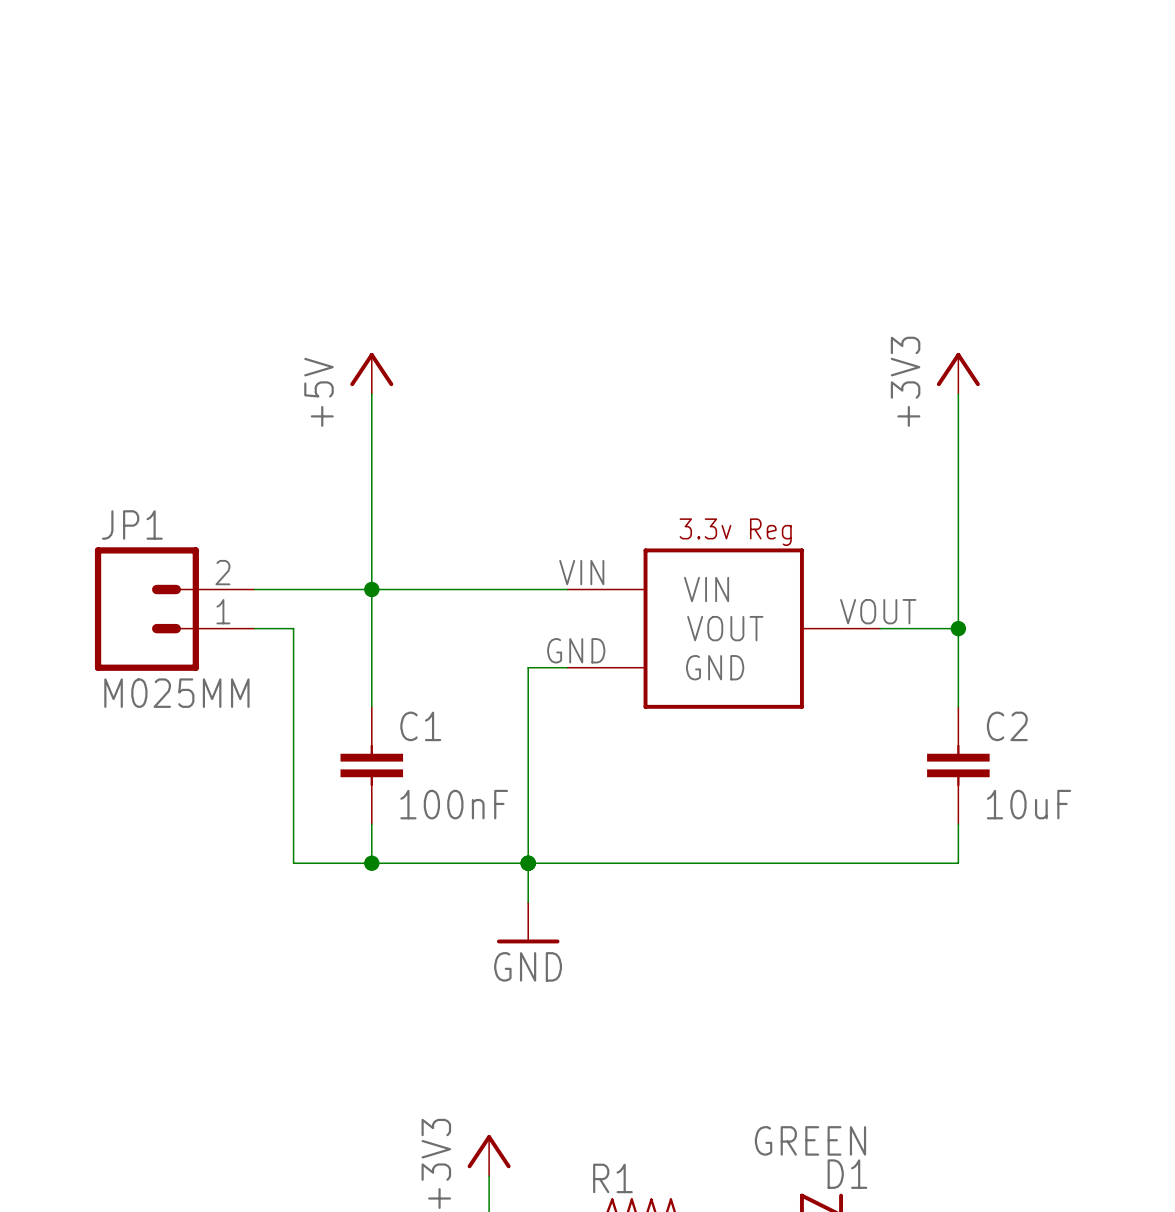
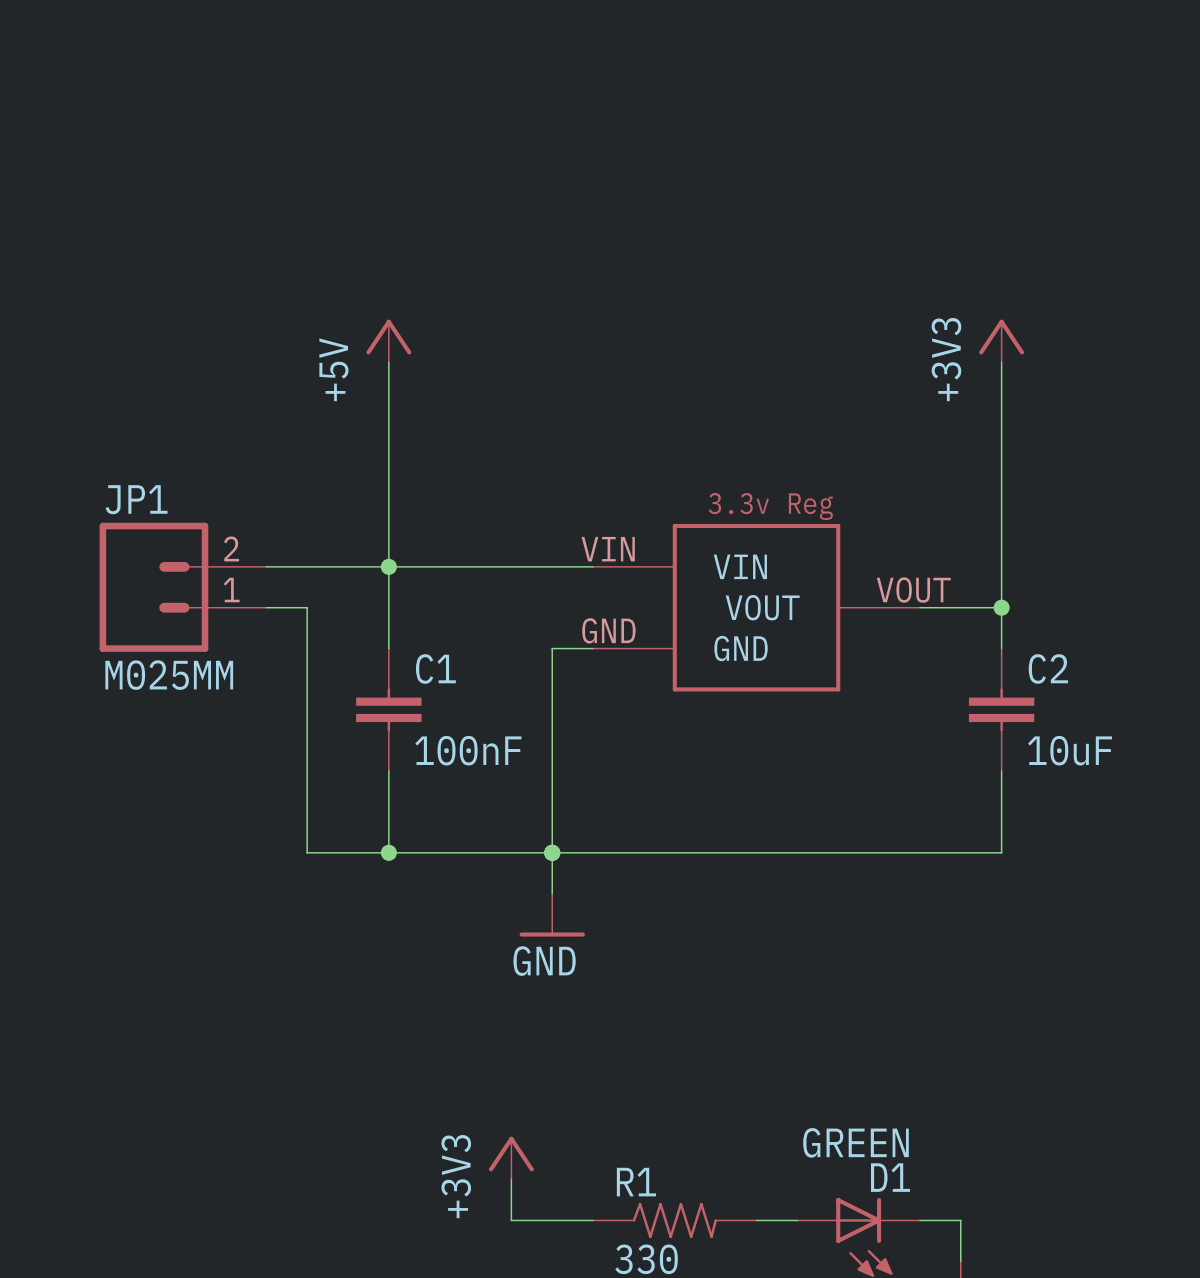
C1 position: (371, 765) -> (388, 709)
C2 position: (958, 765) -> (1001, 709)

